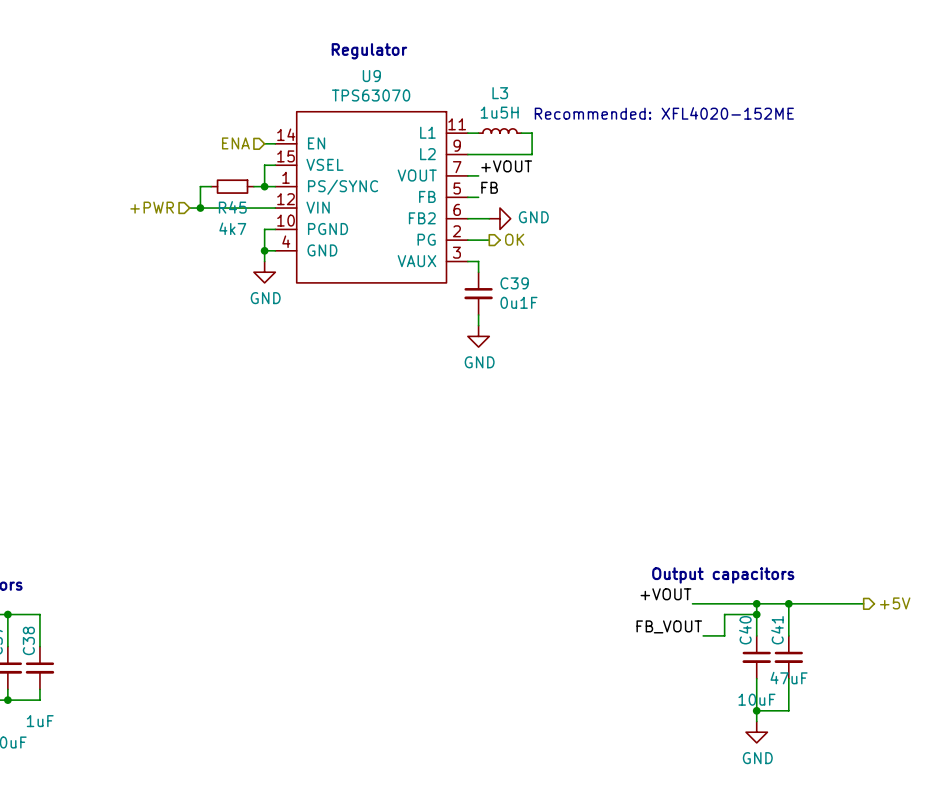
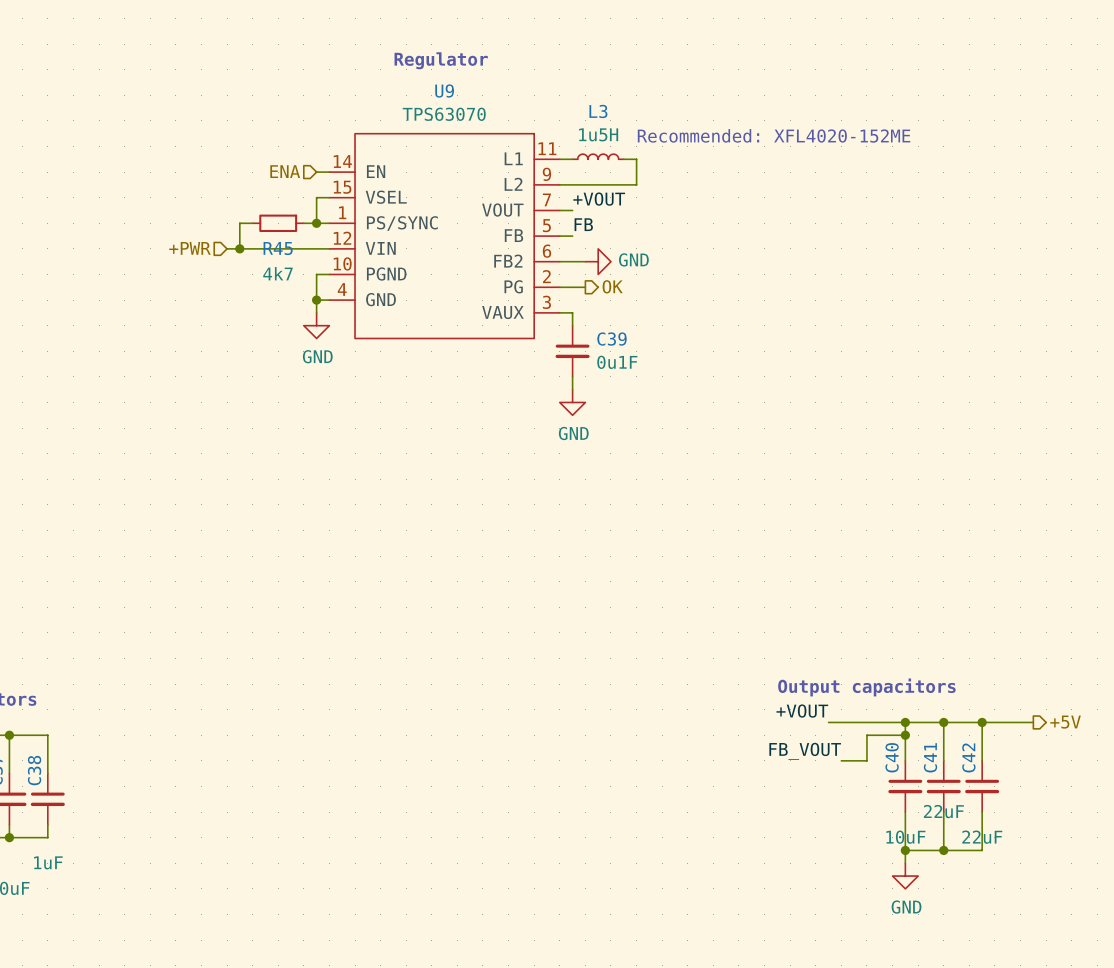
wire: none -> (982, 722) (982, 760)
junction: none -> (982, 722)
C42: none -> 22uF (982, 786)
C41 value: 47uF (789, 678) -> 22uF (943, 811)
wire: none -> (982, 812) (982, 850) (943, 850)
junction: none -> (943, 850)

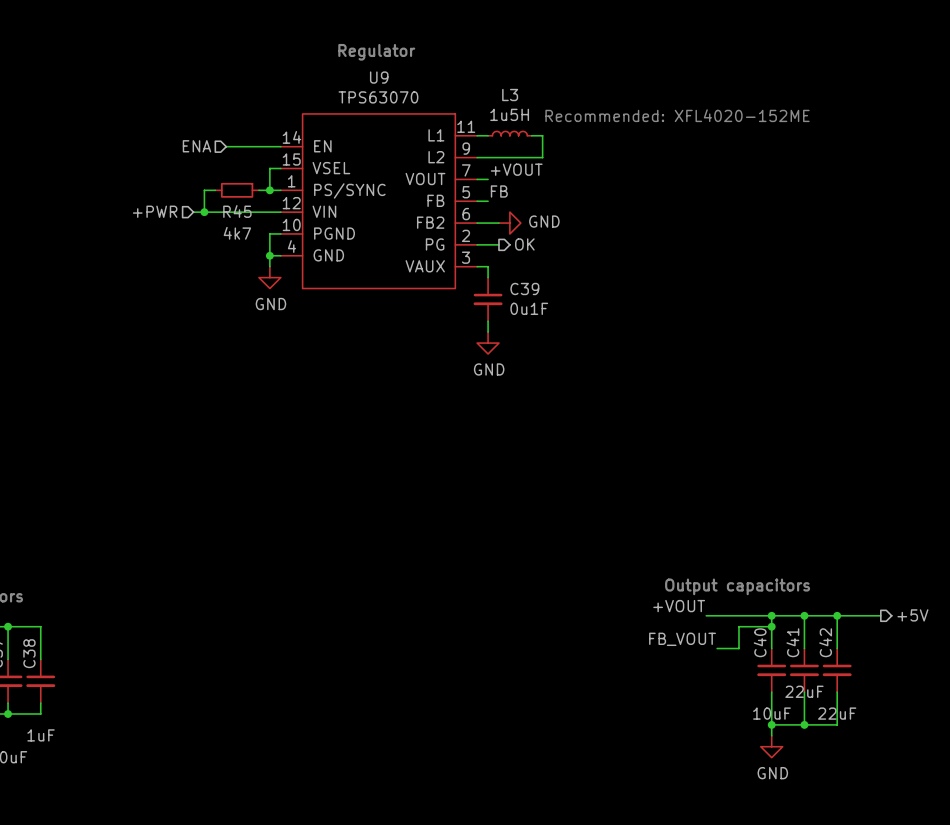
hierarchical label position: ENA (285, 171) -> ENA (196, 146)
wire: none -> (226, 146) (269, 146)

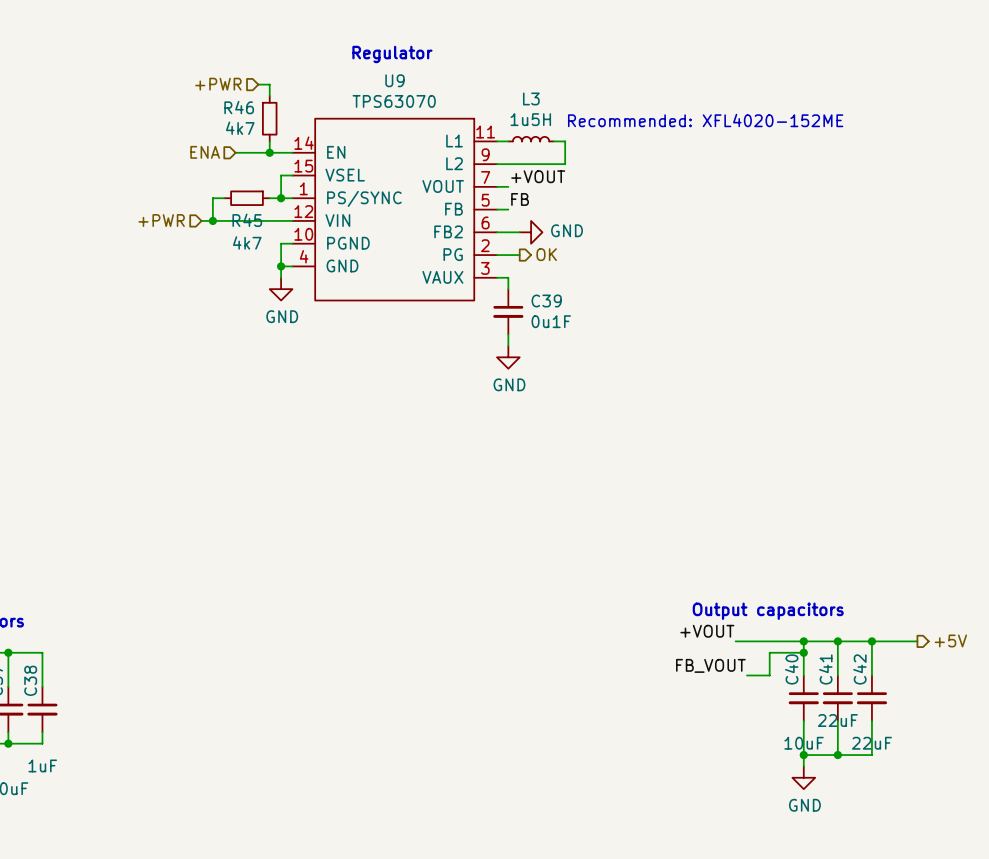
hierarchical label: none -> +PWR (218, 84)
wire: none -> (258, 84) (269, 84) (269, 95)
R46: none -> 4k7 (269, 118)
wire: none -> (269, 141) (269, 152)
junction: none -> (269, 152)

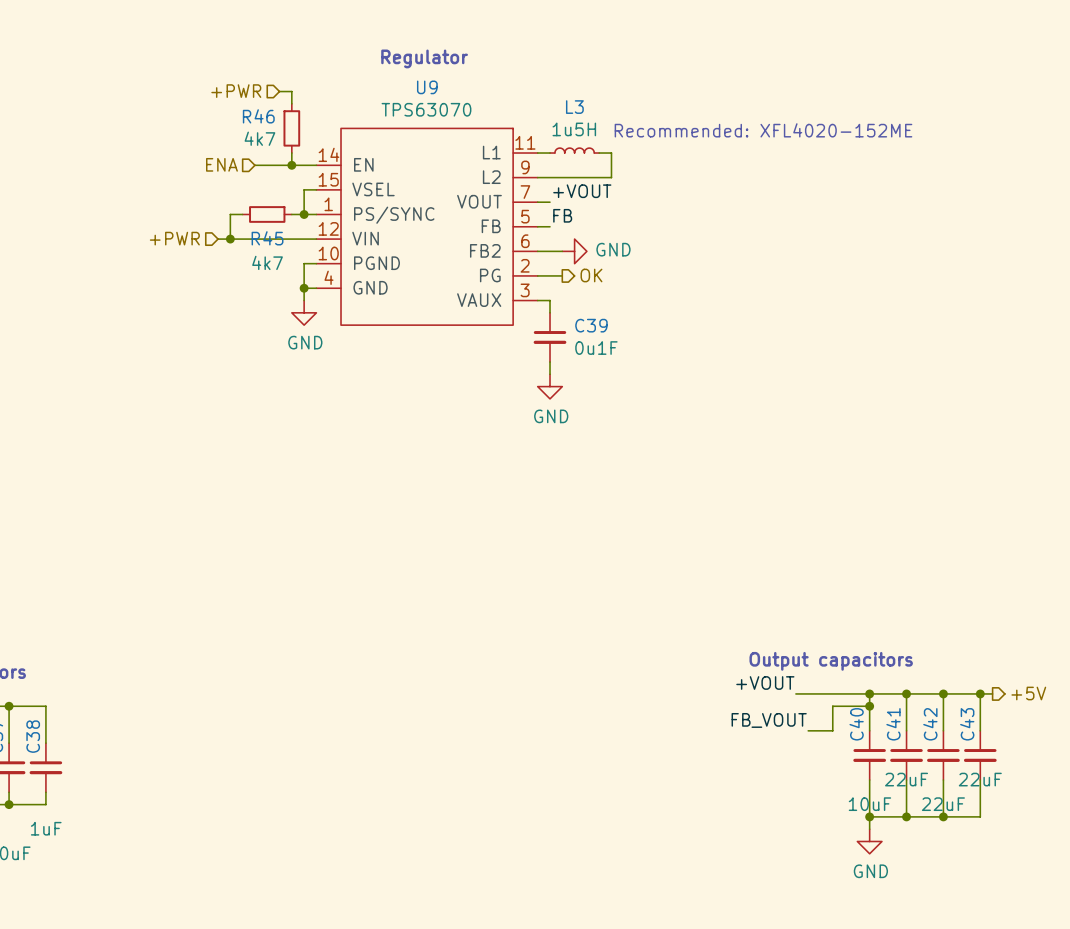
wire: none -> (980, 693) (980, 730)
junction: none -> (980, 693)
C43: none -> 22uF (980, 755)
wire: none -> (980, 780) (980, 816) (943, 816)
junction: none -> (943, 816)

